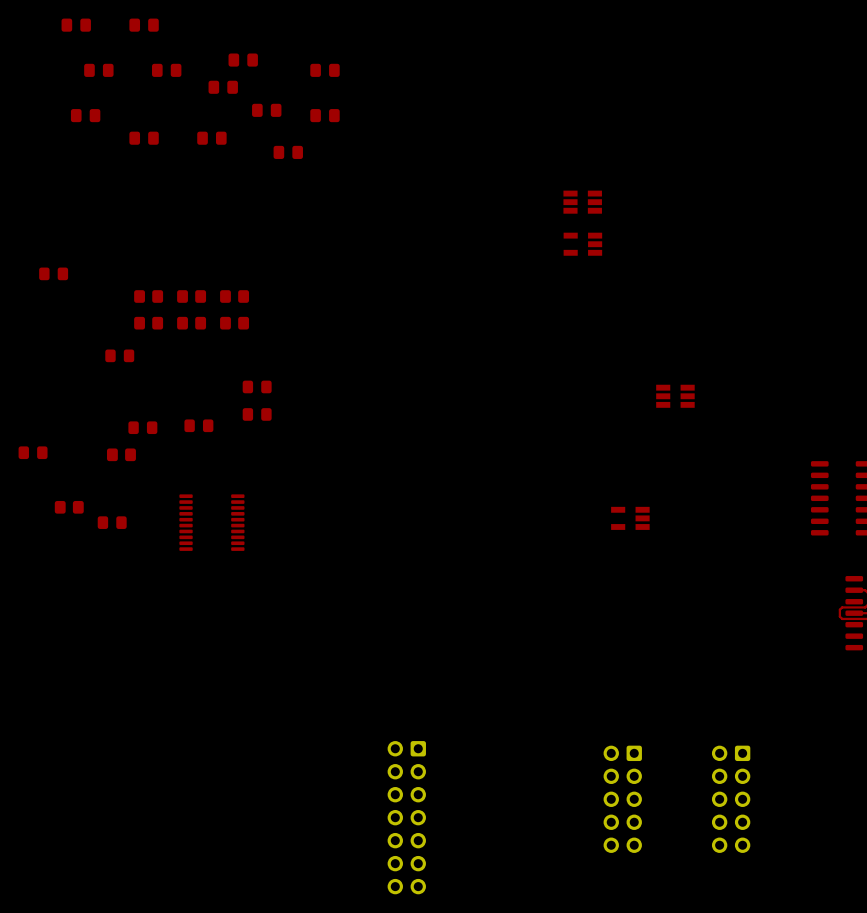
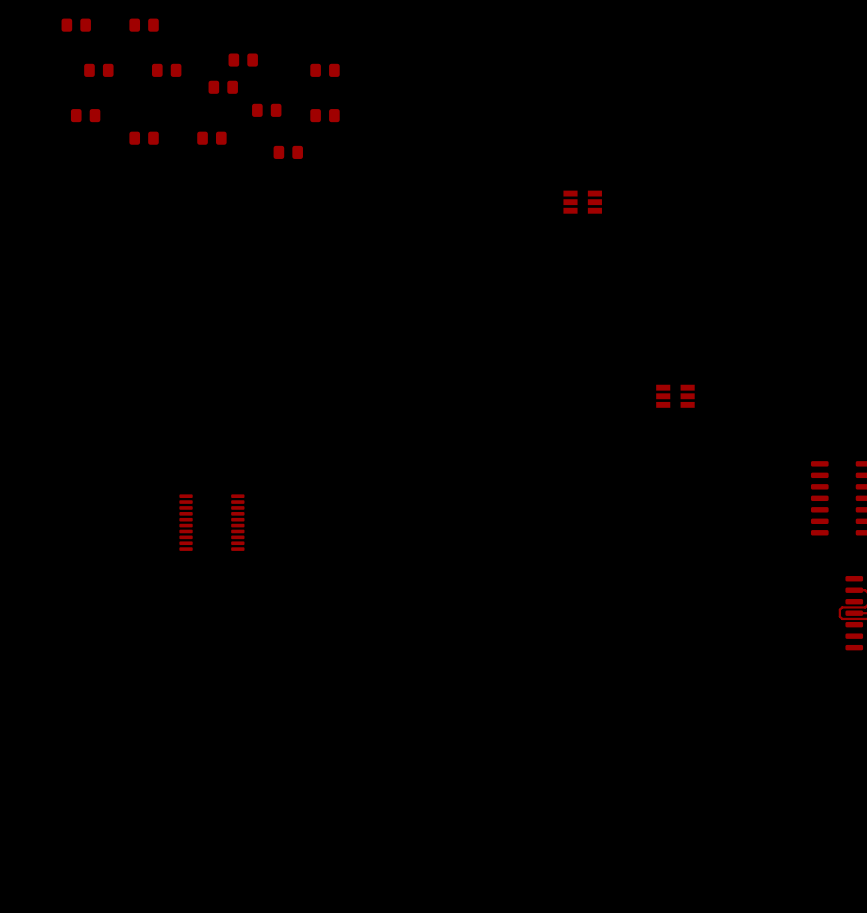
part: (582, 244) -> none
part: (53, 273) -> none
part: (148, 296) -> none
part: (191, 296) -> none
part: (234, 296) -> none
part: (148, 323) -> none
part: (191, 323) -> none
part: (234, 323) -> none
part: (119, 355) -> none
part: (257, 386) -> none
part: (257, 414) -> none
part: (198, 425) -> none
part: (142, 427) -> none
part: (33, 452) -> none
part: (121, 454) -> none
part: (69, 507) -> none
part: (630, 518) -> none
part: (112, 522) -> none
part: (622, 799) -> none
part: (731, 799) -> none
part: (406, 817) -> none

